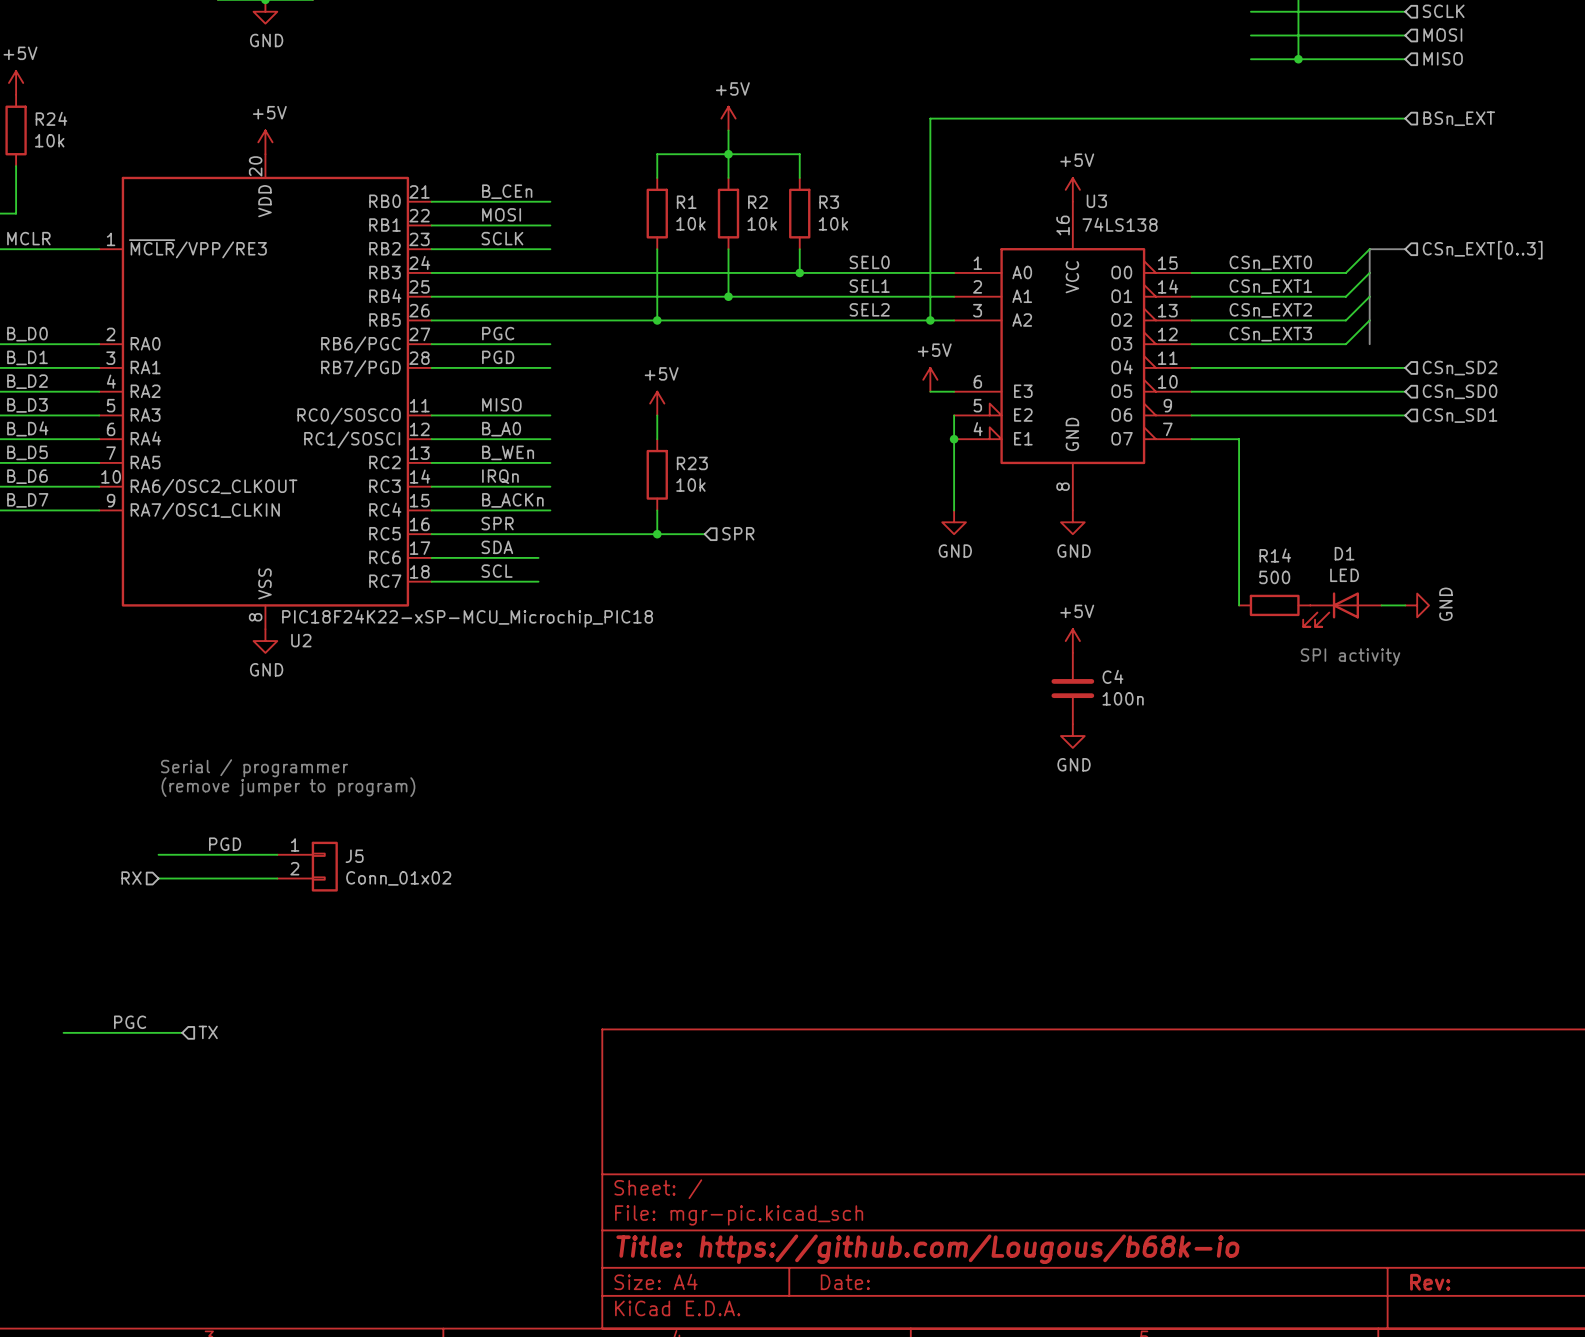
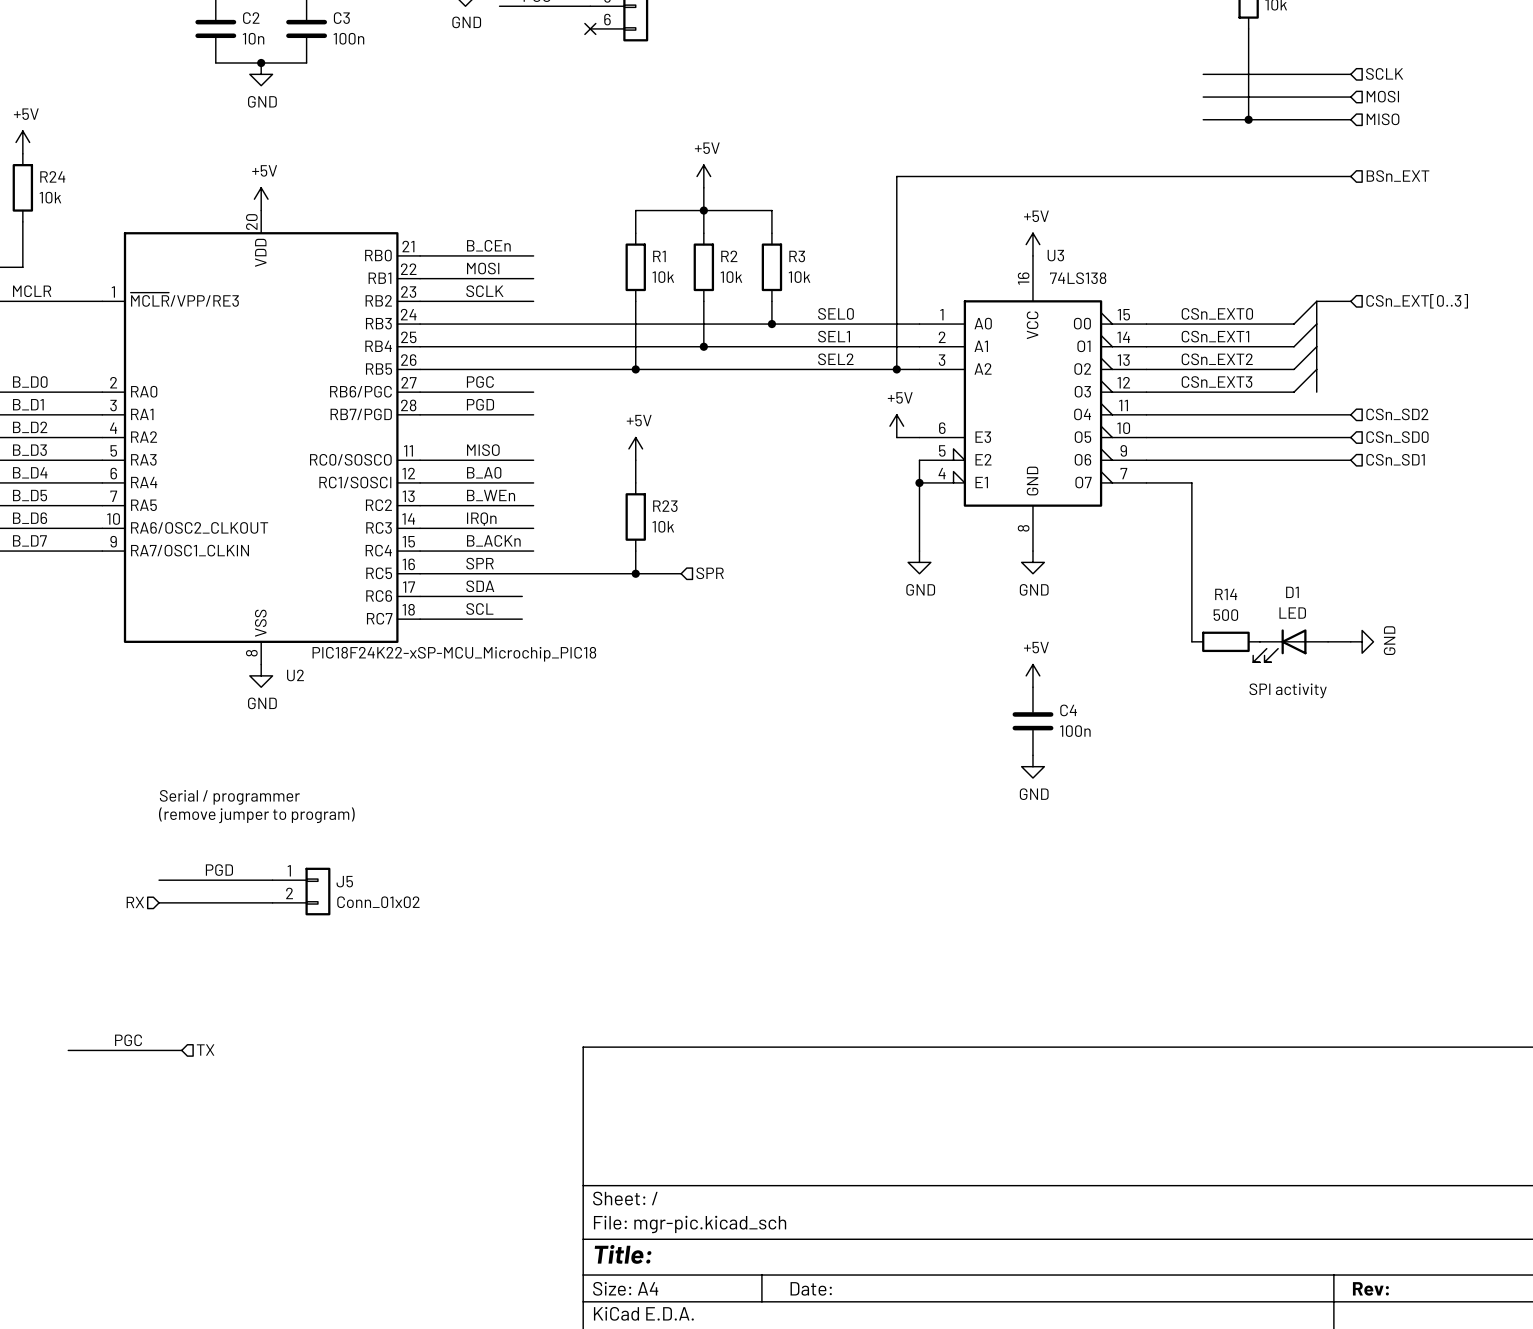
title block: Title: https://github.com/Lougous/b68k-io (927, 1249) -> Title: (623, 1254)

